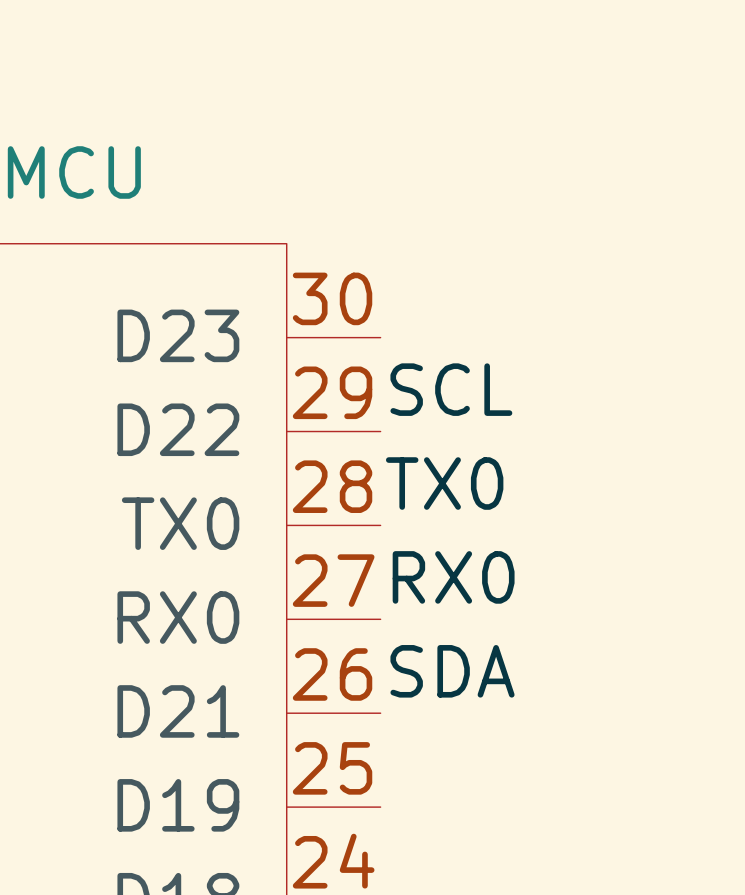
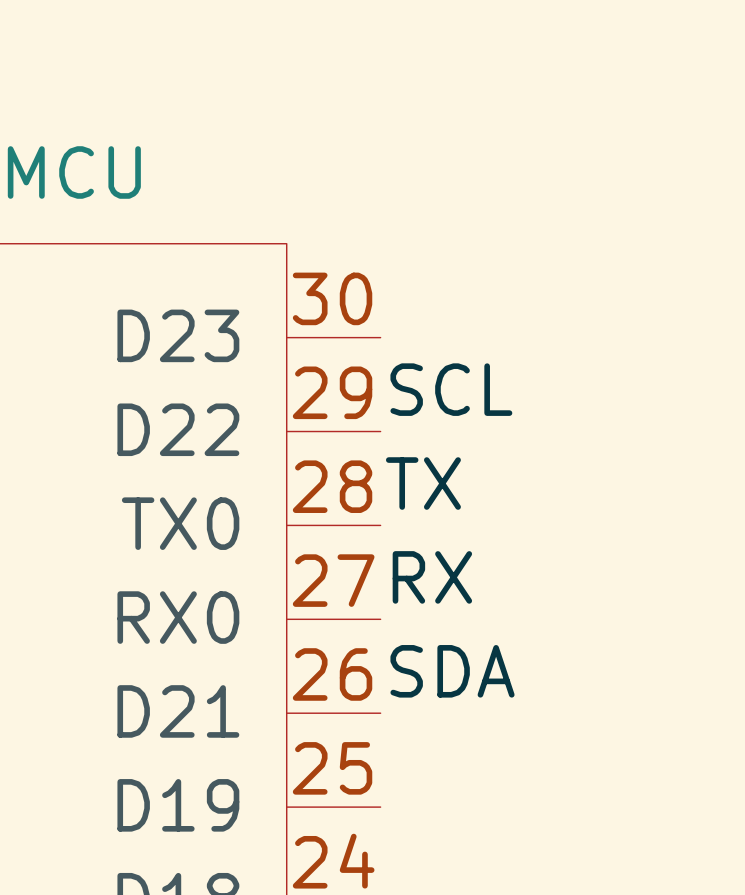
label: TX0 (444, 483) -> TX (423, 483)
label: RX0 (453, 577) -> RX (432, 577)

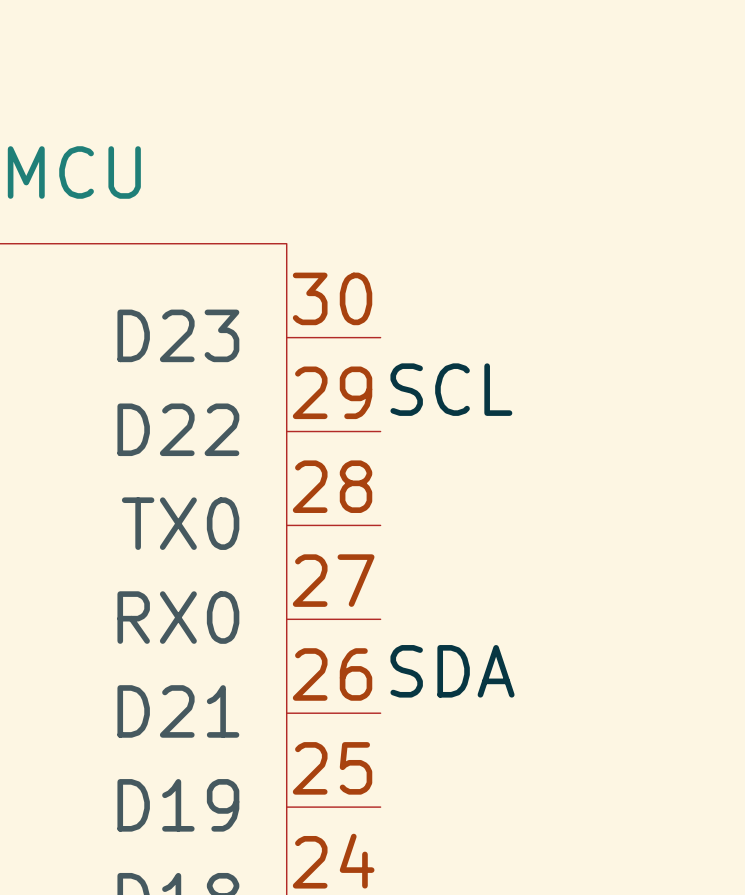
label: TX (423, 483) -> none
label: RX (432, 577) -> none

